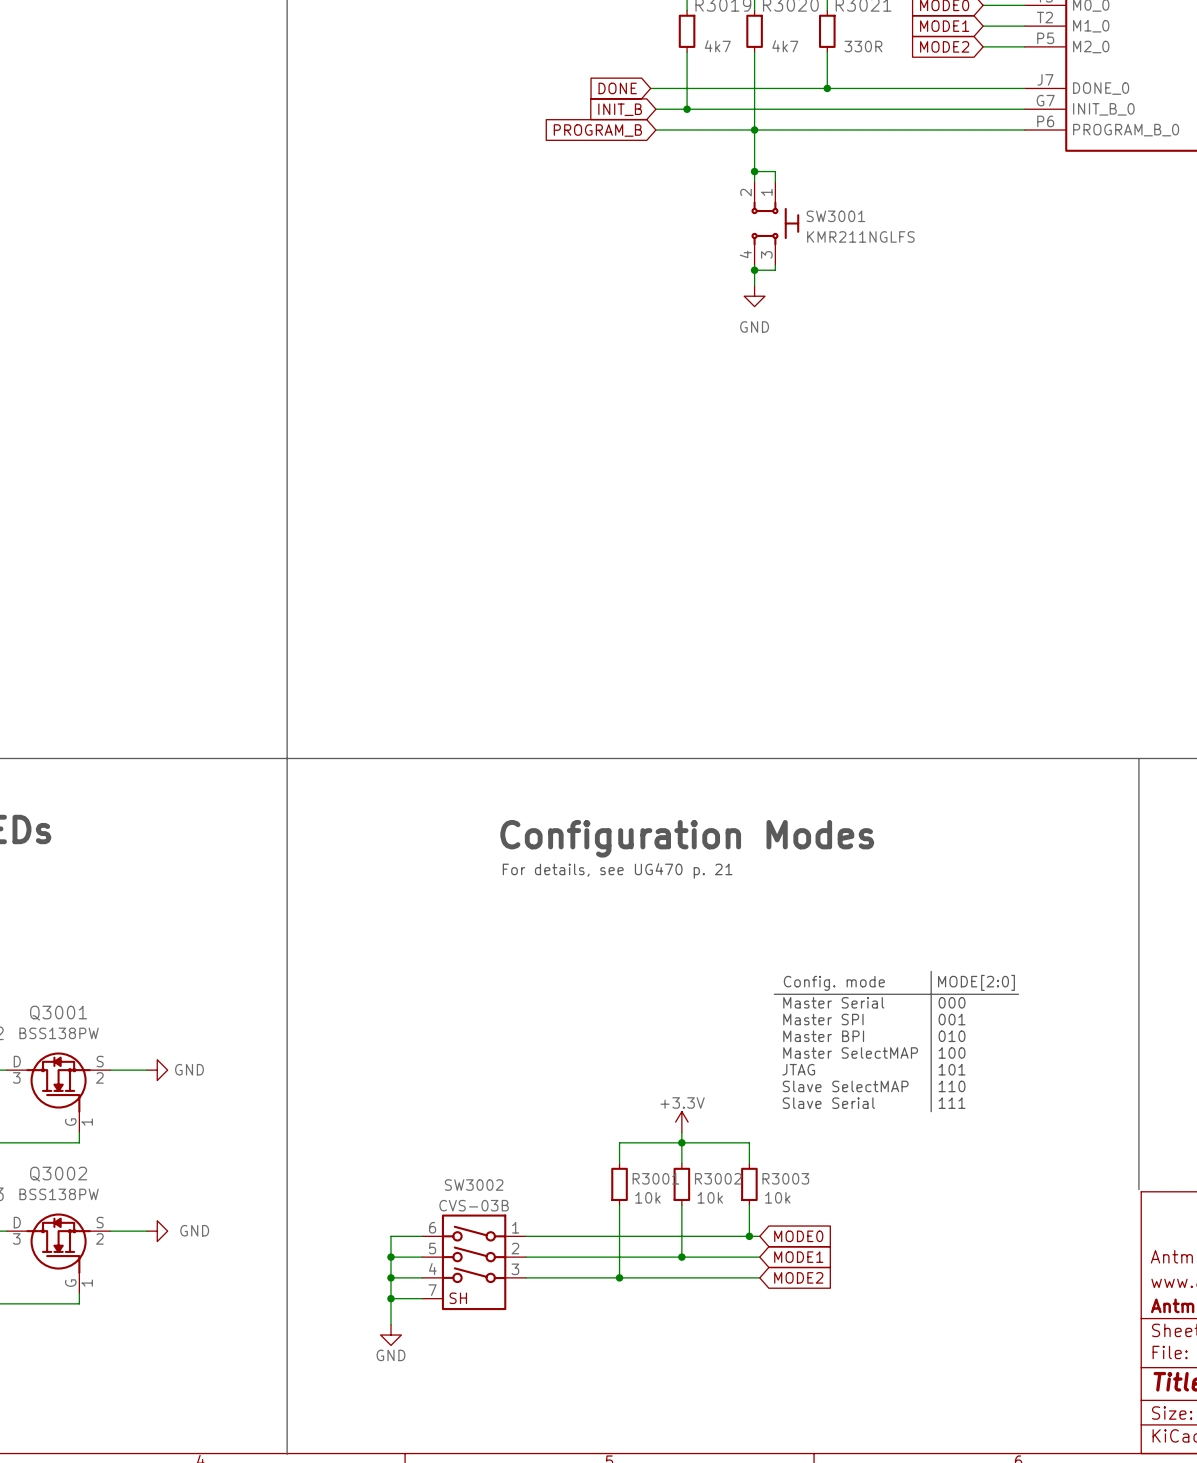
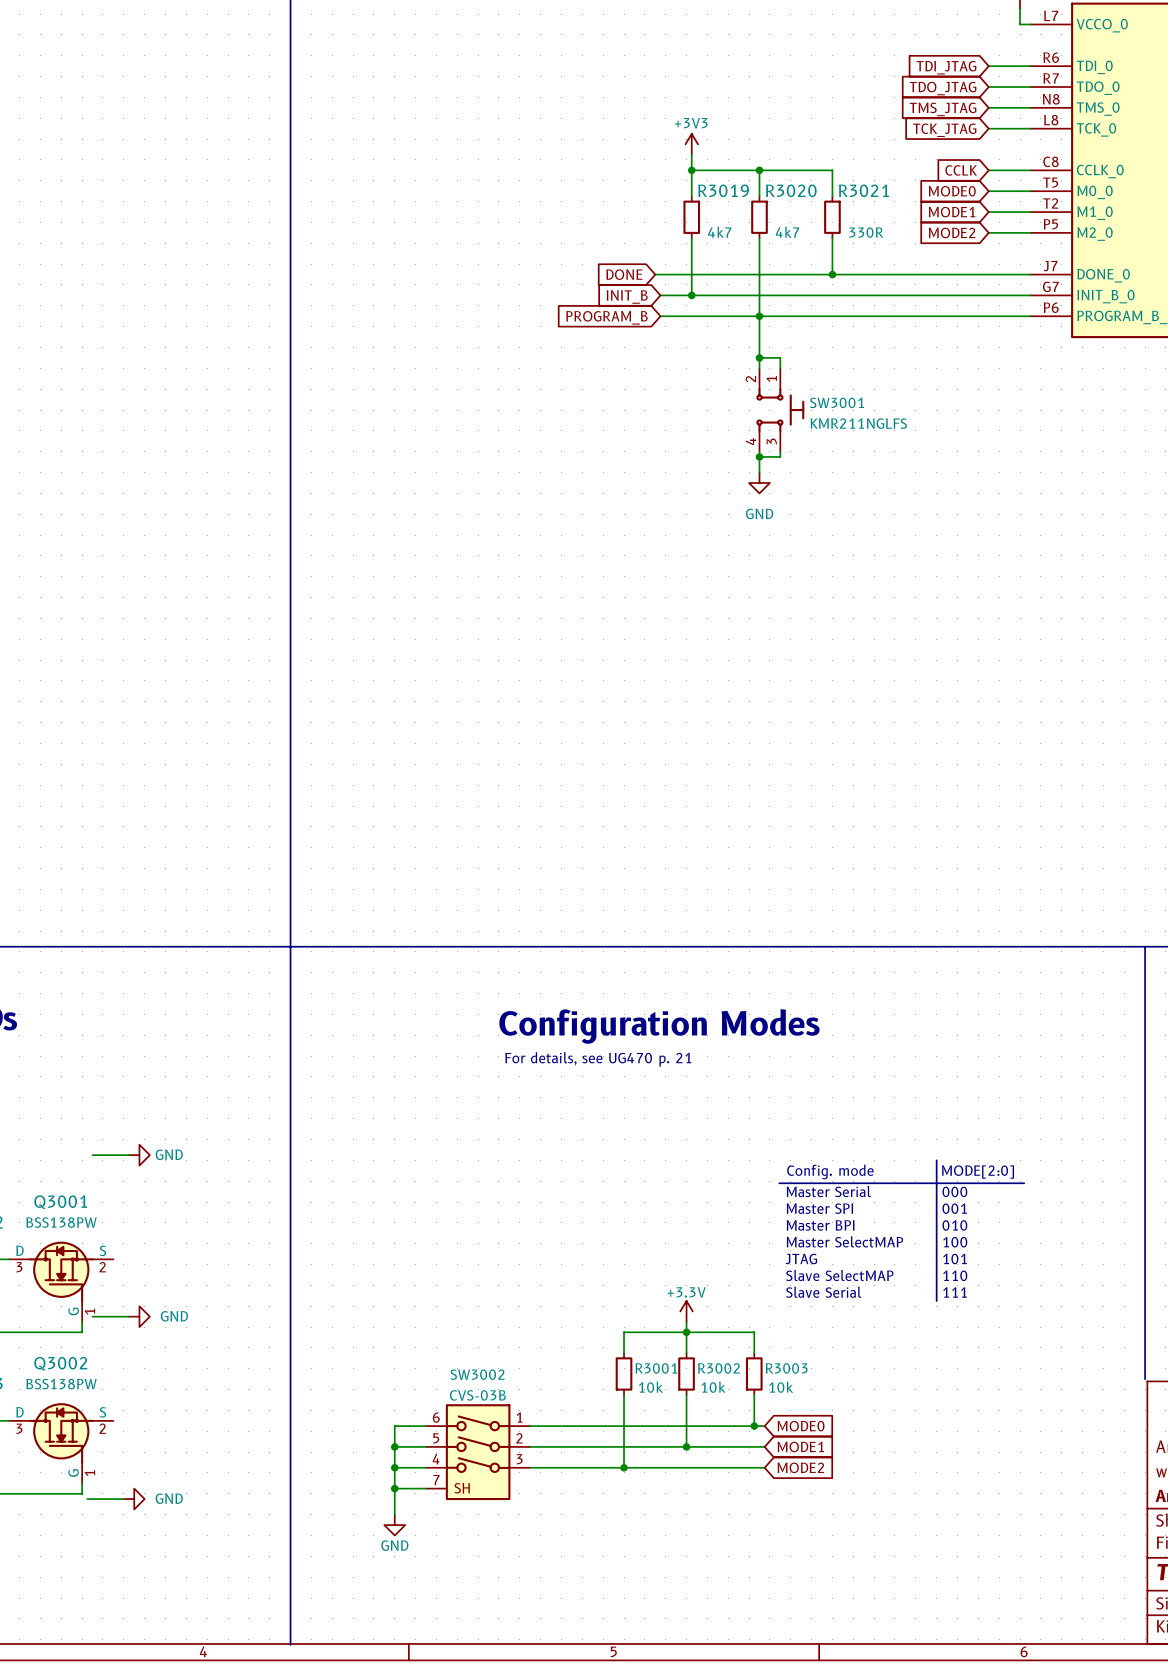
power symbol: none -> GND (139, 1155)
wire: (110, 1070) (146, 1070) -> (92, 1155) (129, 1155)
power symbol: GND (157, 1070) -> none
power symbol: none -> GND (139, 1316)
wire: (110, 1231) (146, 1231) -> (92, 1316) (129, 1316)
power symbol: GND (157, 1231) -> none
wire: none -> (87, 1499) (123, 1499)
power symbol: none -> GND (134, 1499)

